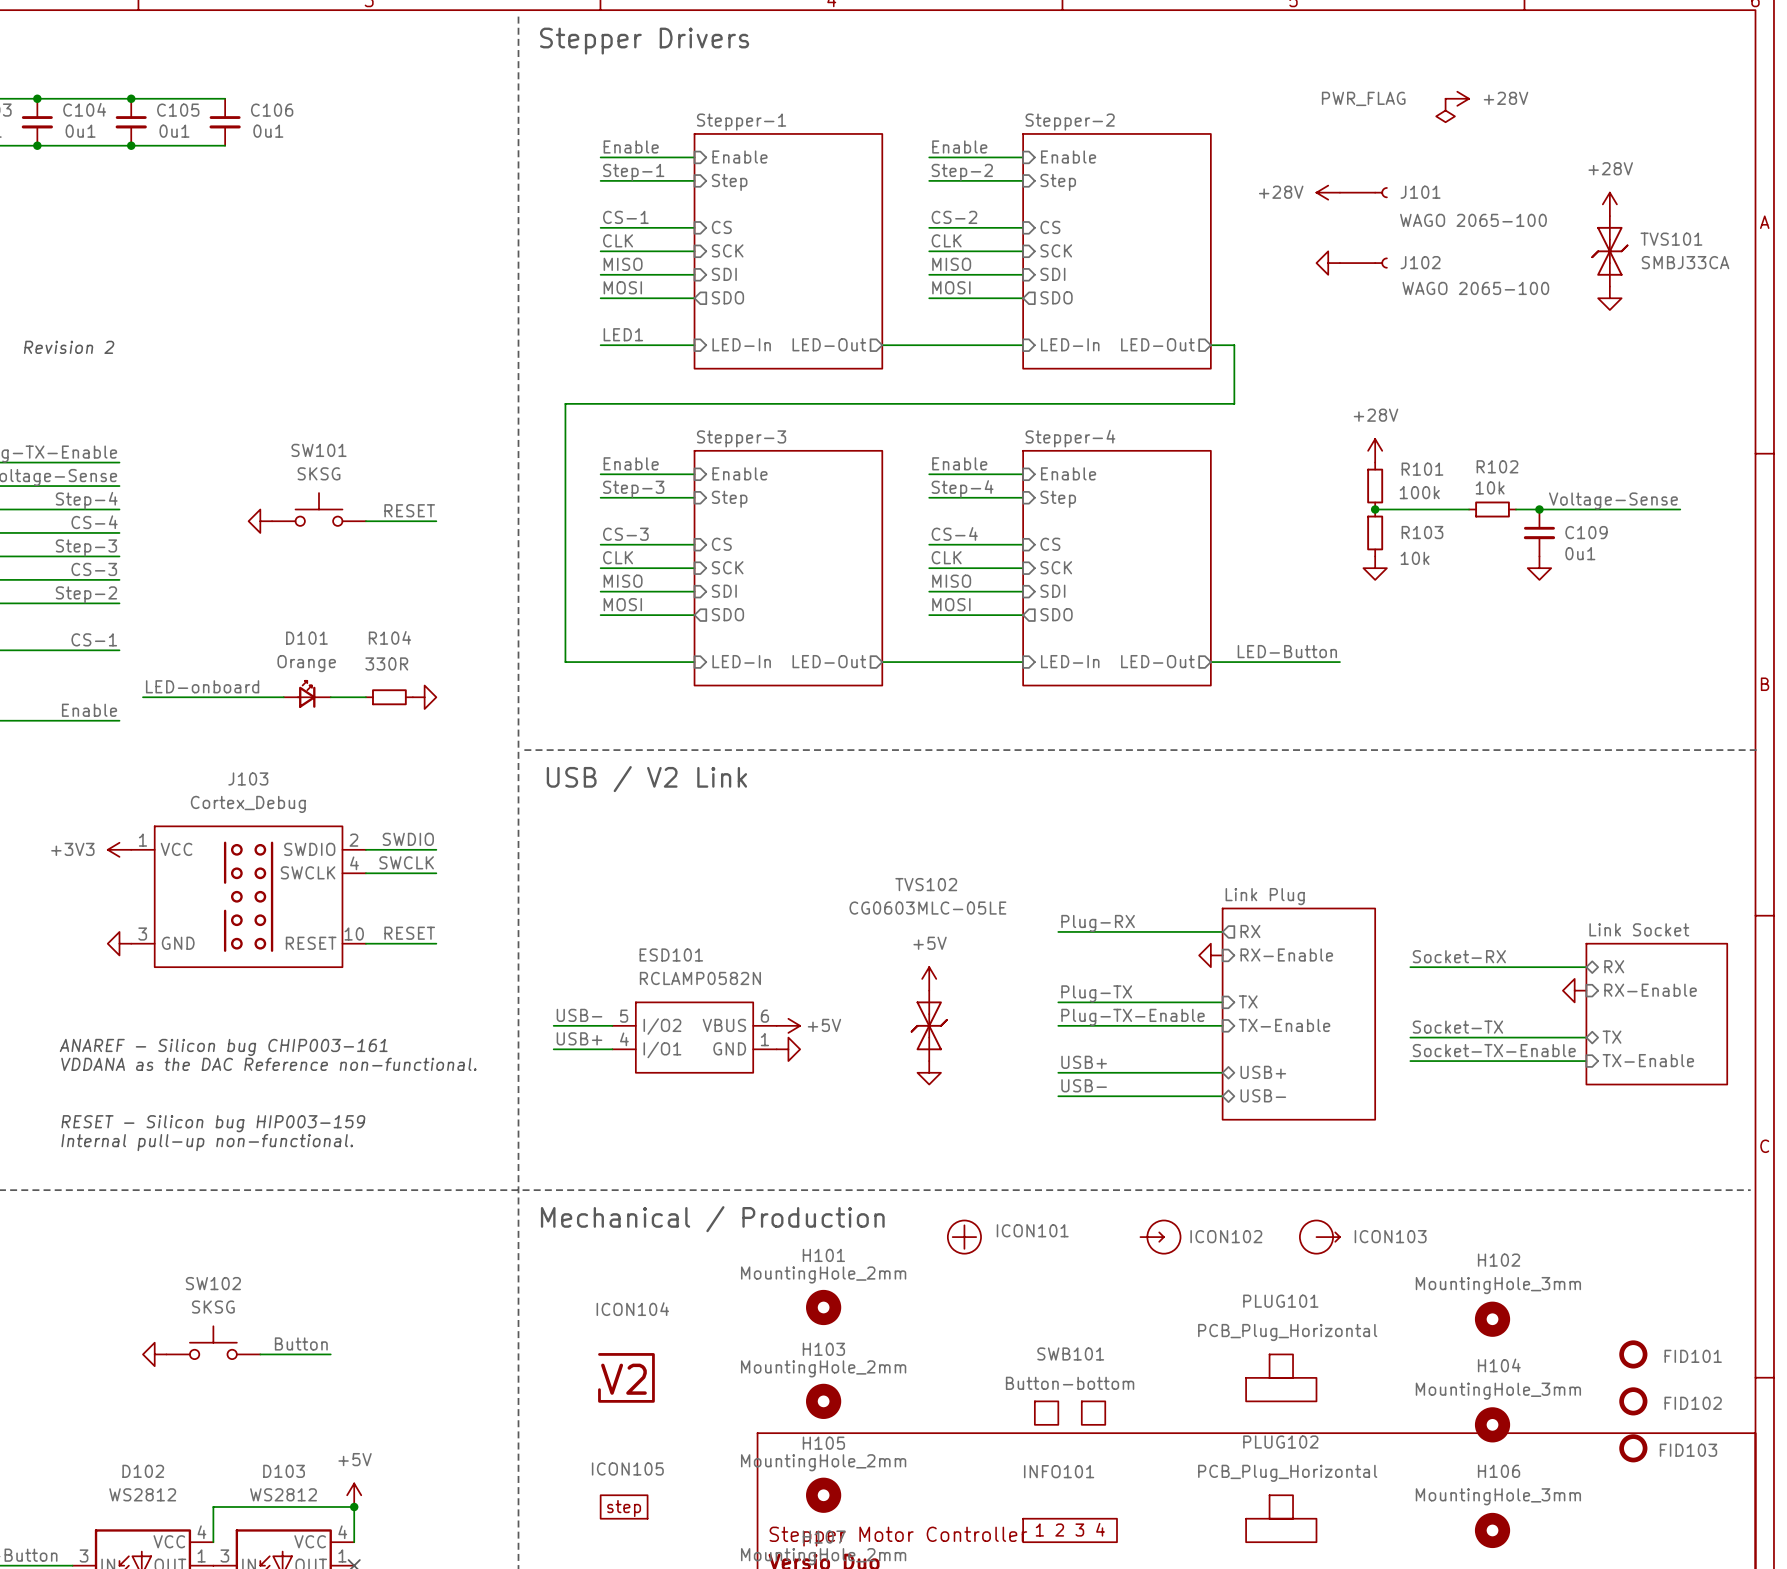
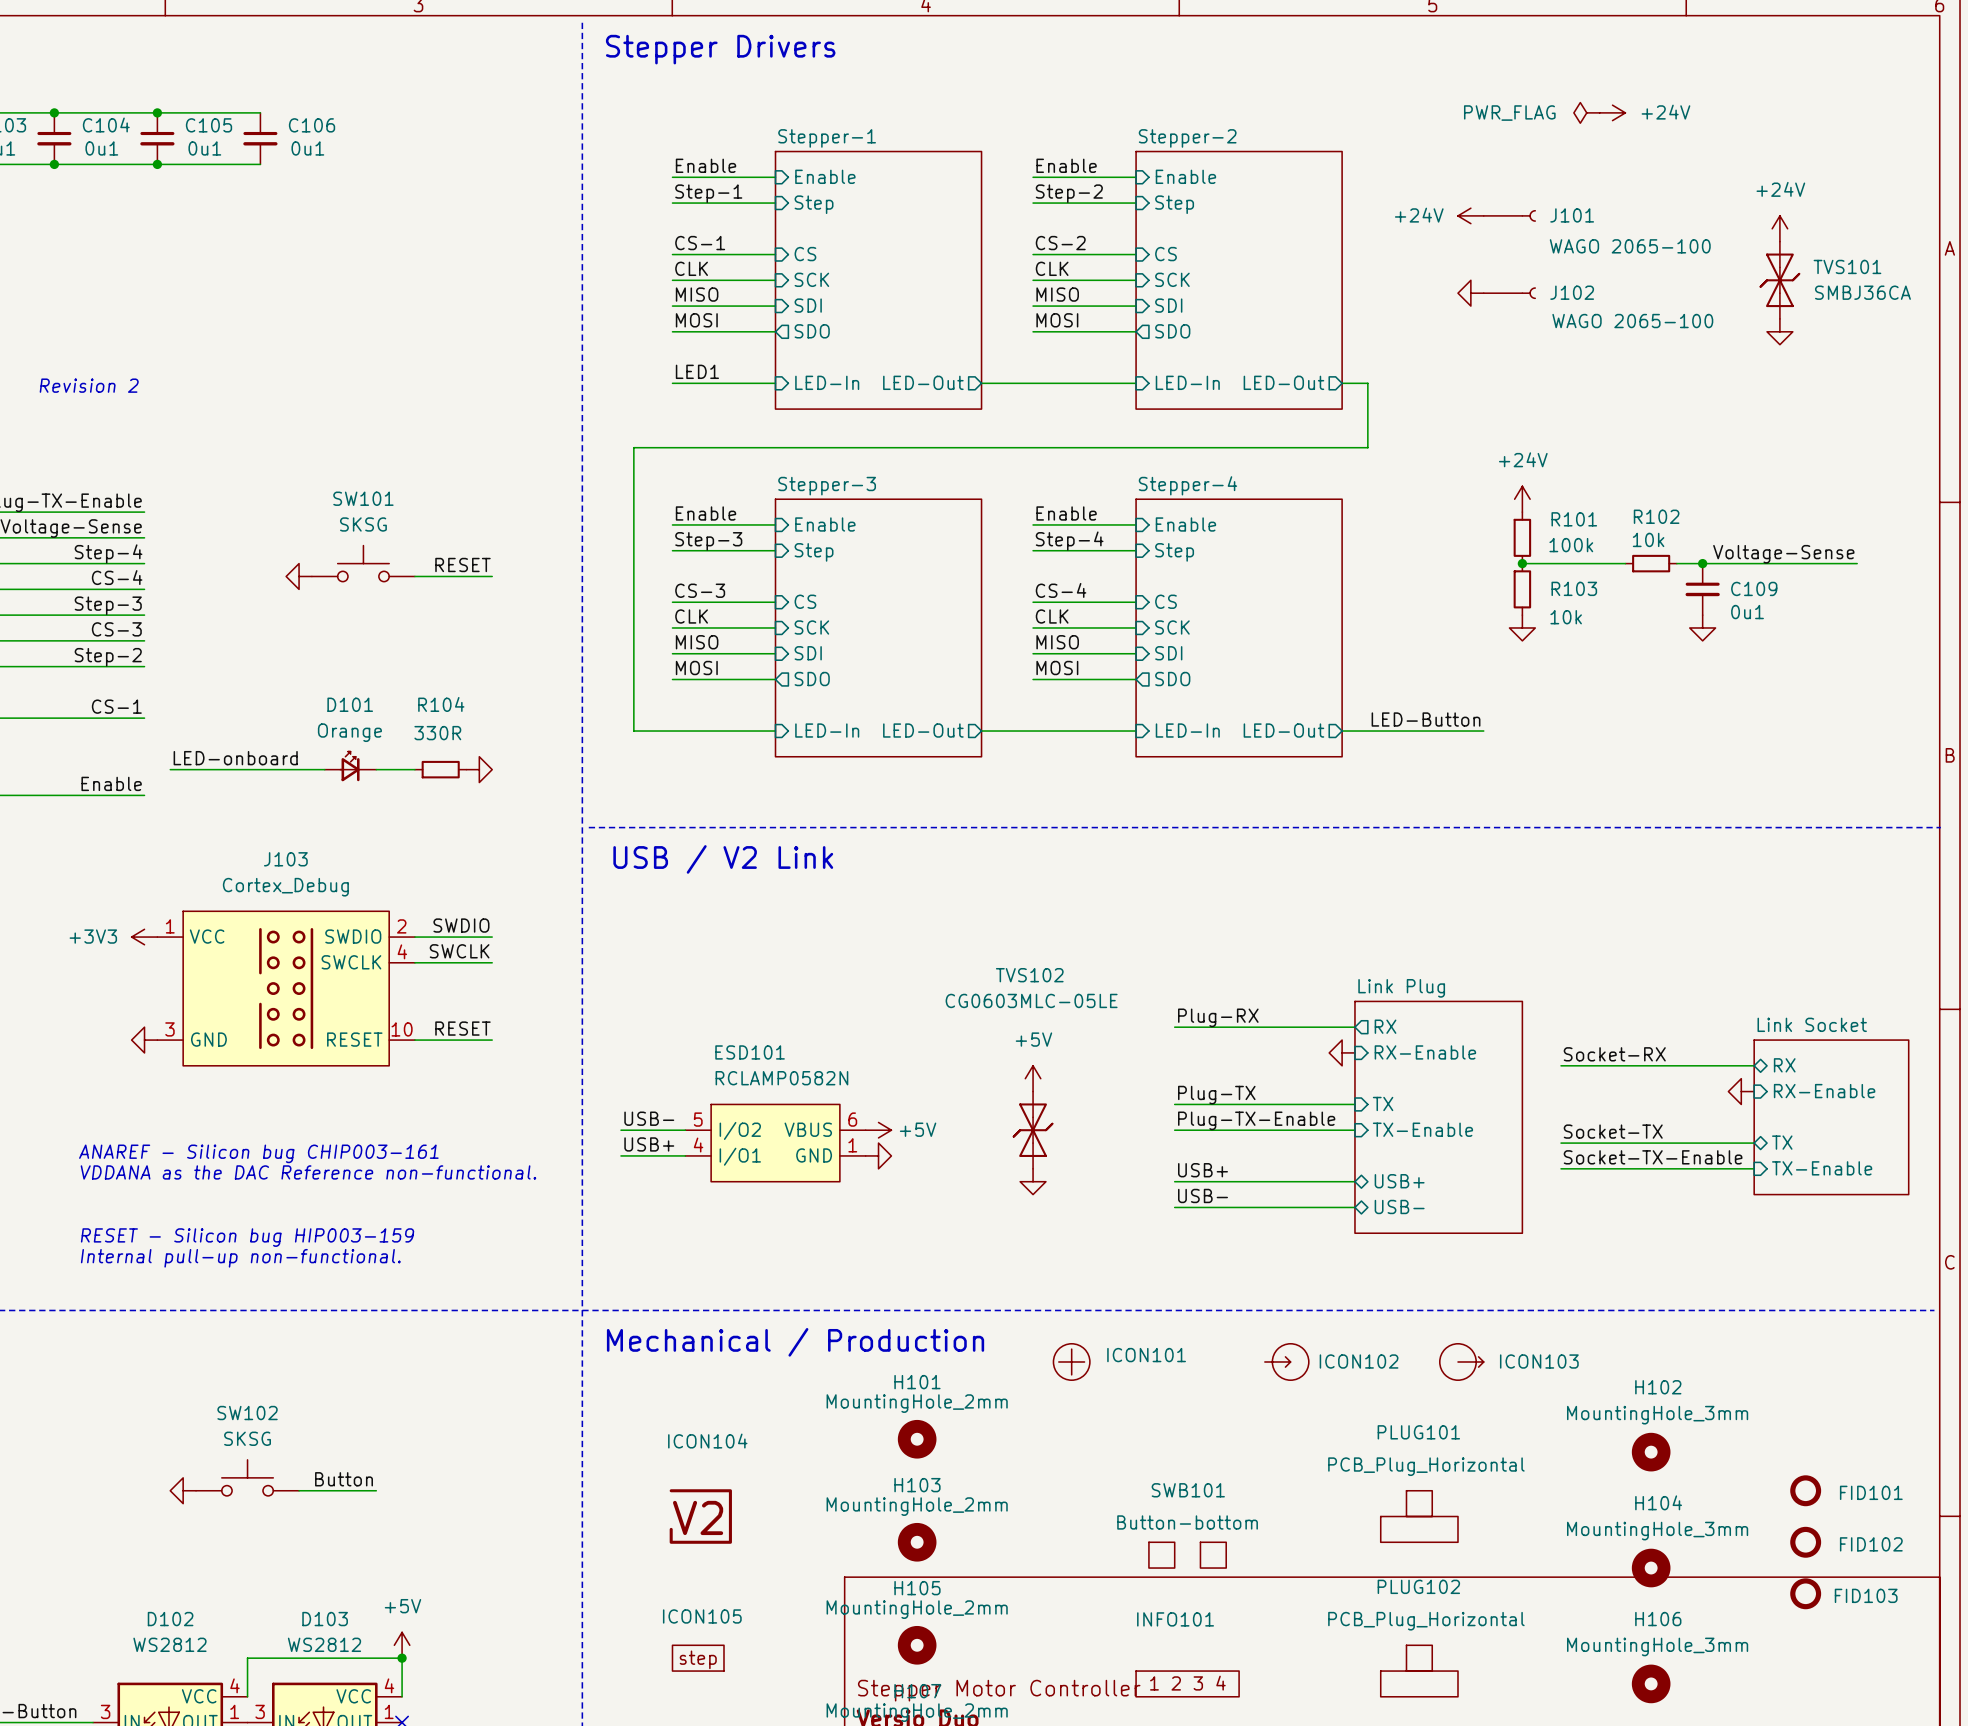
power symbol: +28V (1457, 98) -> +24V (1612, 112)
power symbol rotation: 0° (1445, 110) -> 90° clockwise (1586, 112)
power symbol position: PWR_FLAG (1445, 110) -> PWR_FLAG (1586, 112)
power symbol: +28V (1328, 192) -> +24V (1470, 215)
power symbol: +28V (1609, 204) -> +24V (1779, 228)
TVS101 value: SMBJ33CA (1685, 262) -> SMBJ36CA (1862, 292)
power symbol: +28V (1375, 450) -> +24V (1522, 499)

